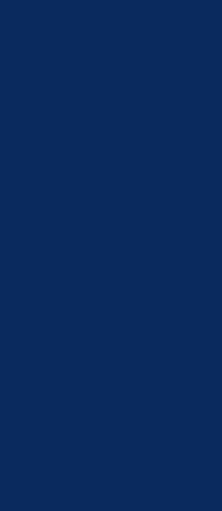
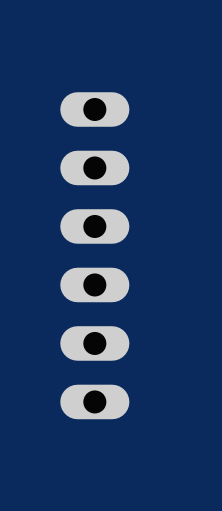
part: none -> (94, 255)

